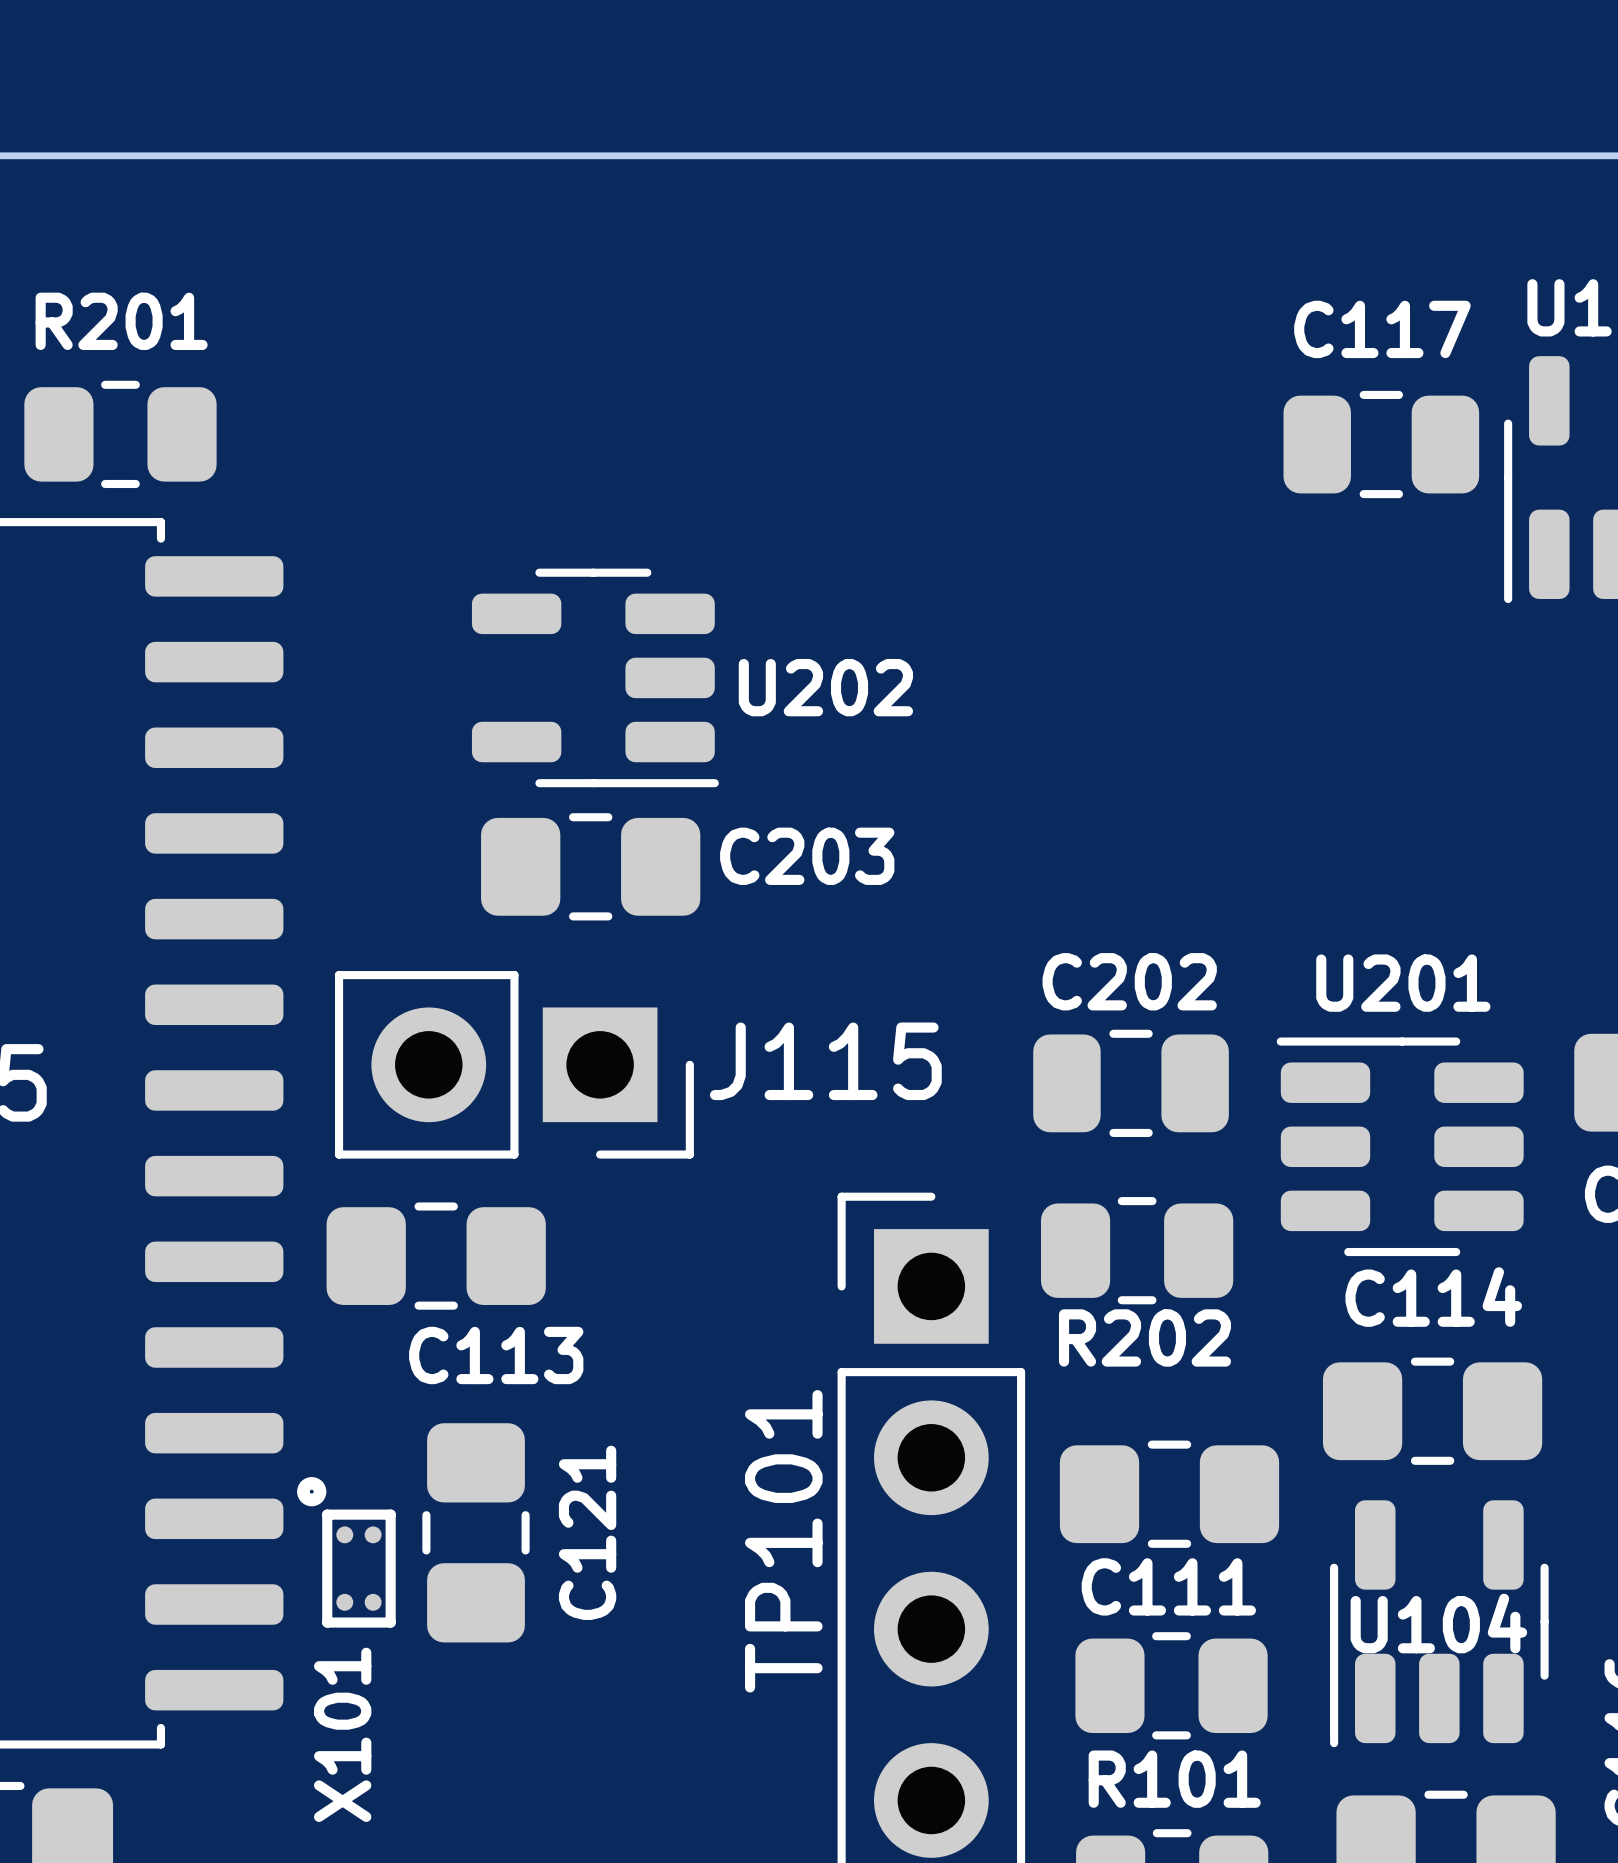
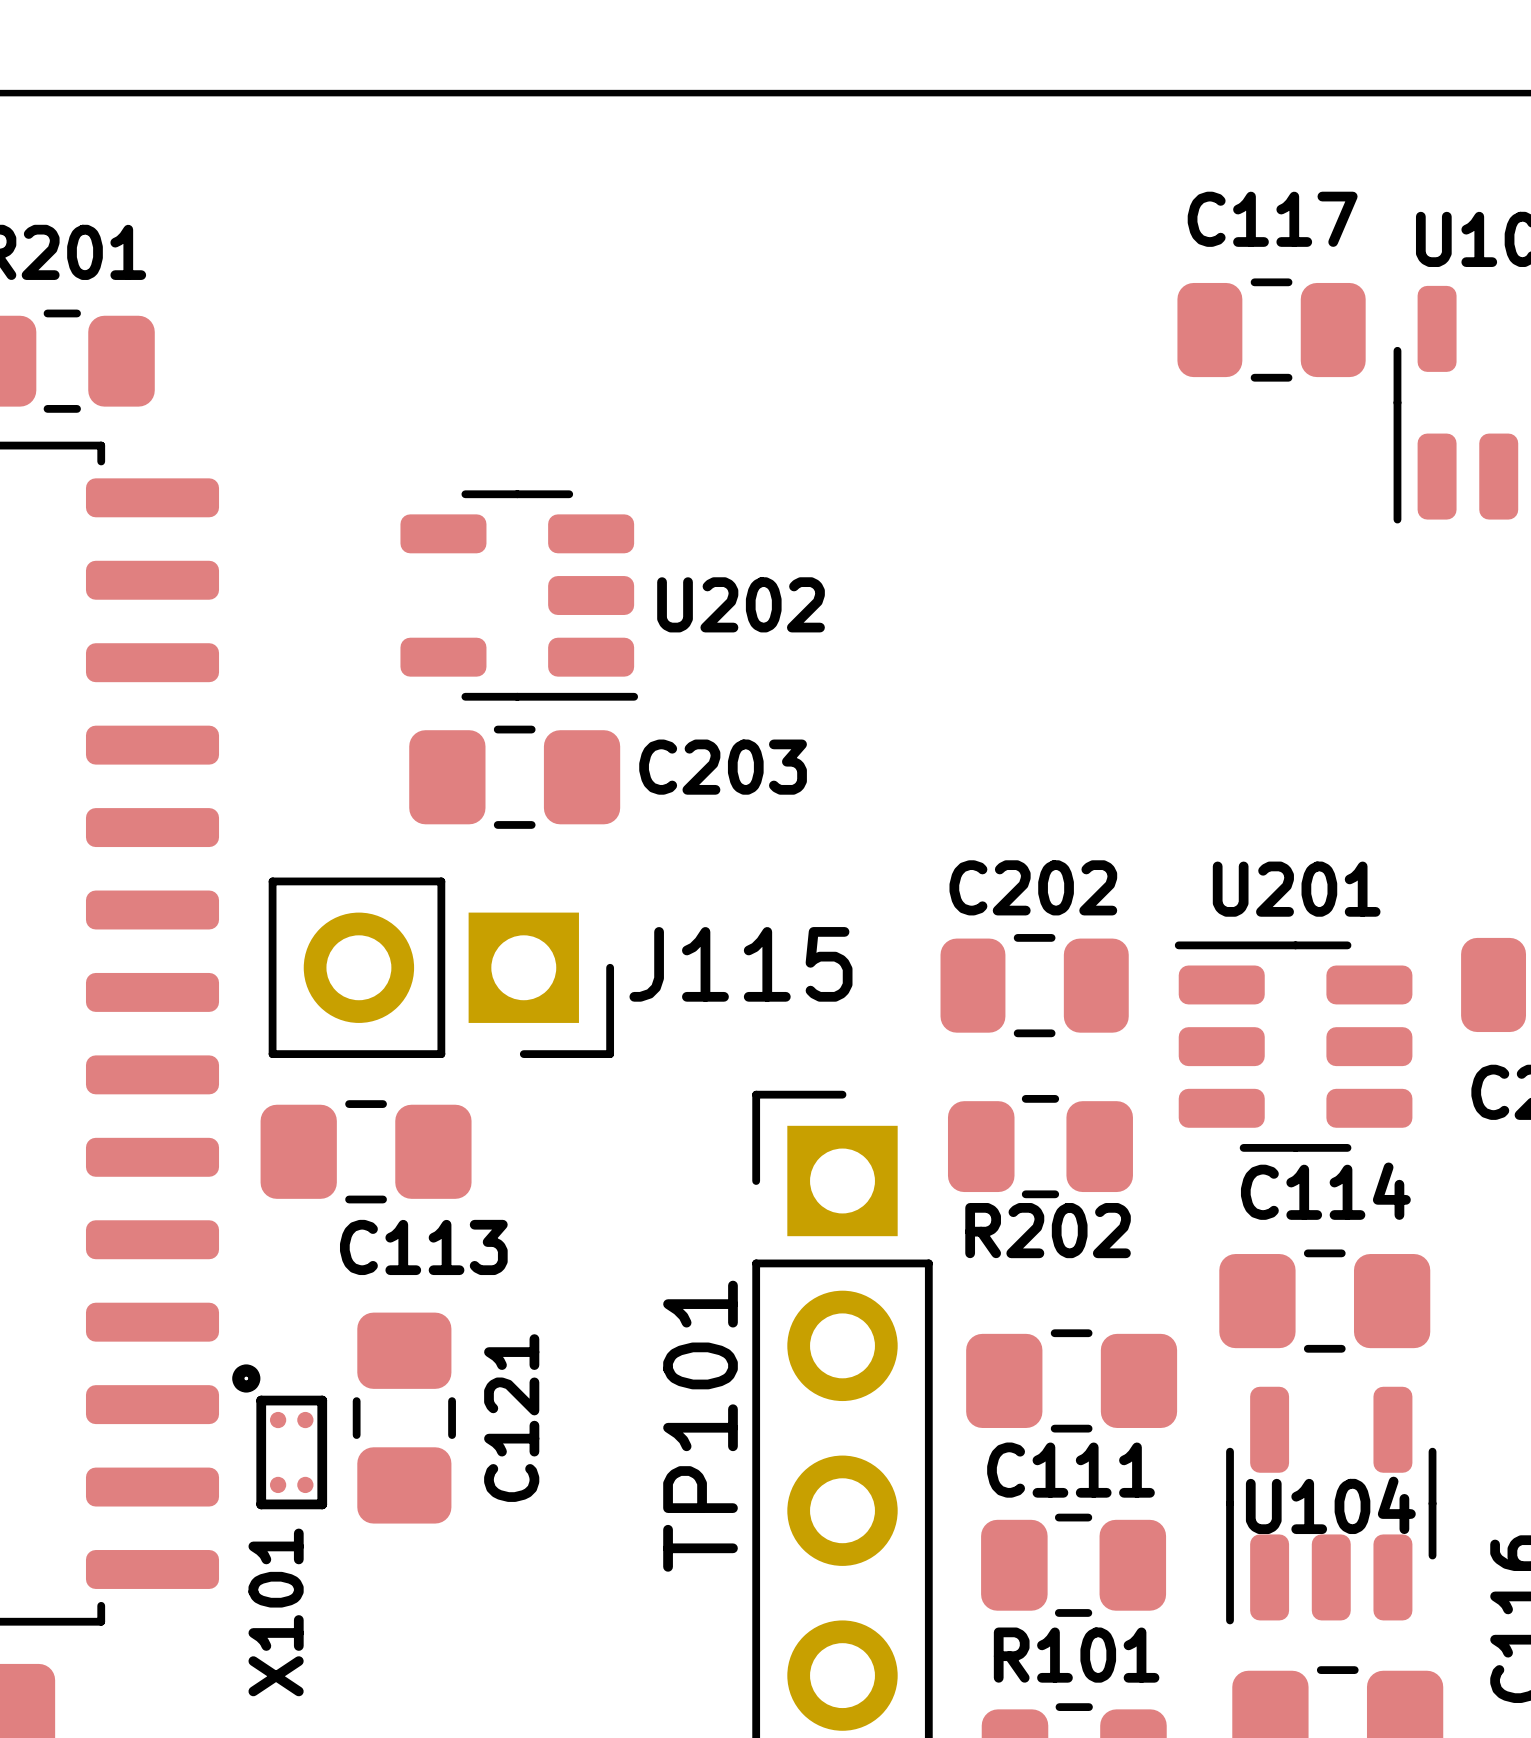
C117 position: (1381, 444) -> (1271, 330)

